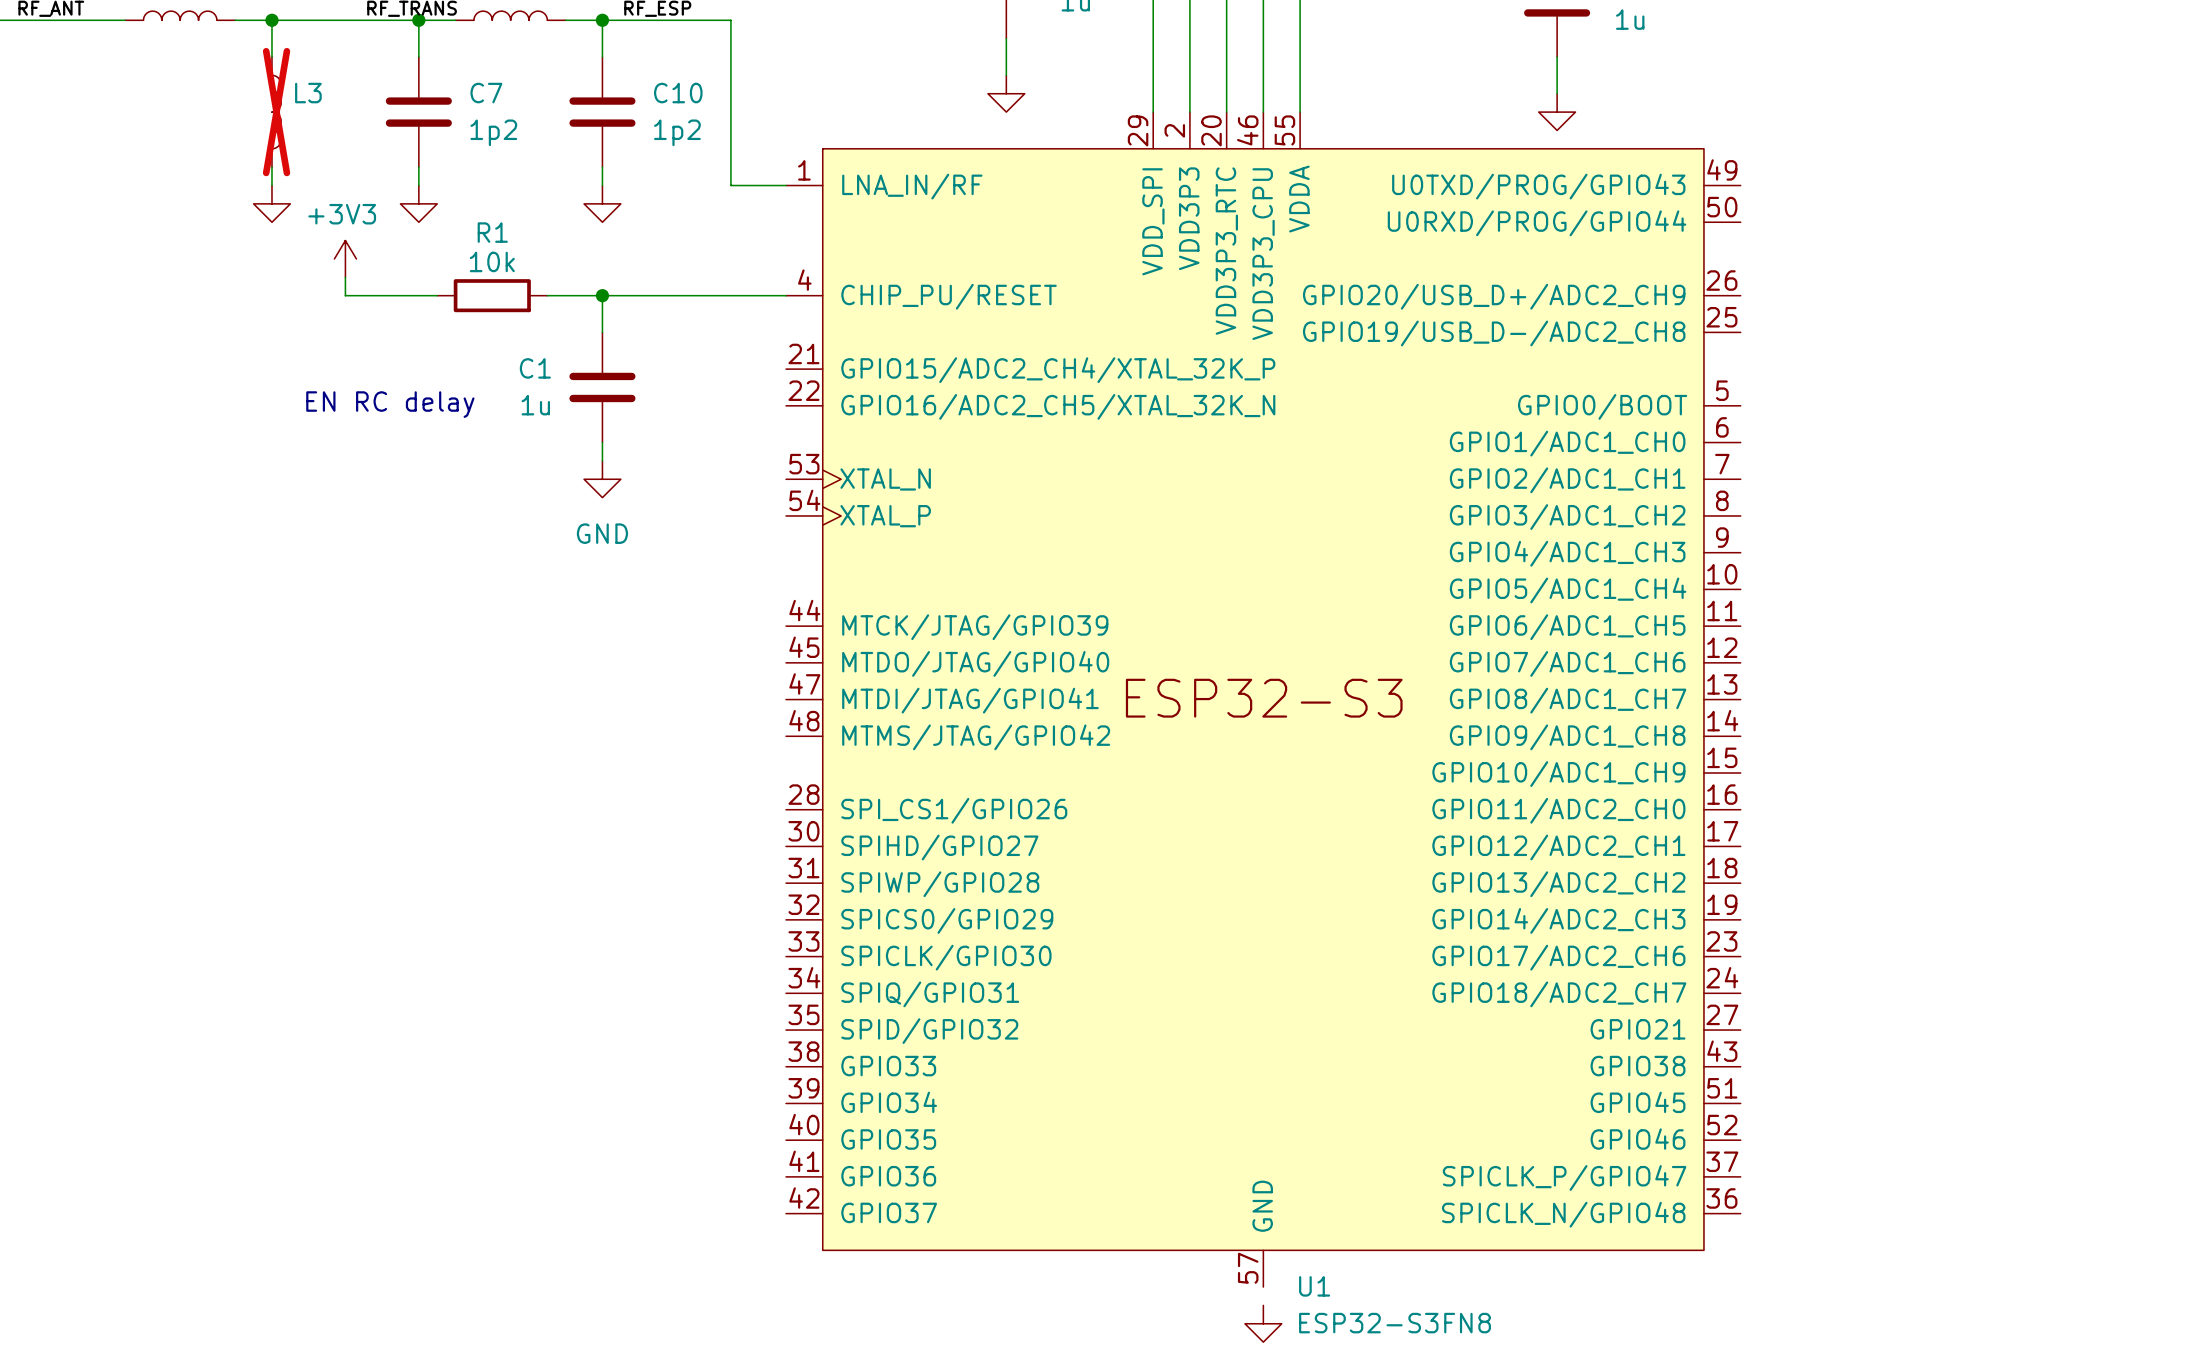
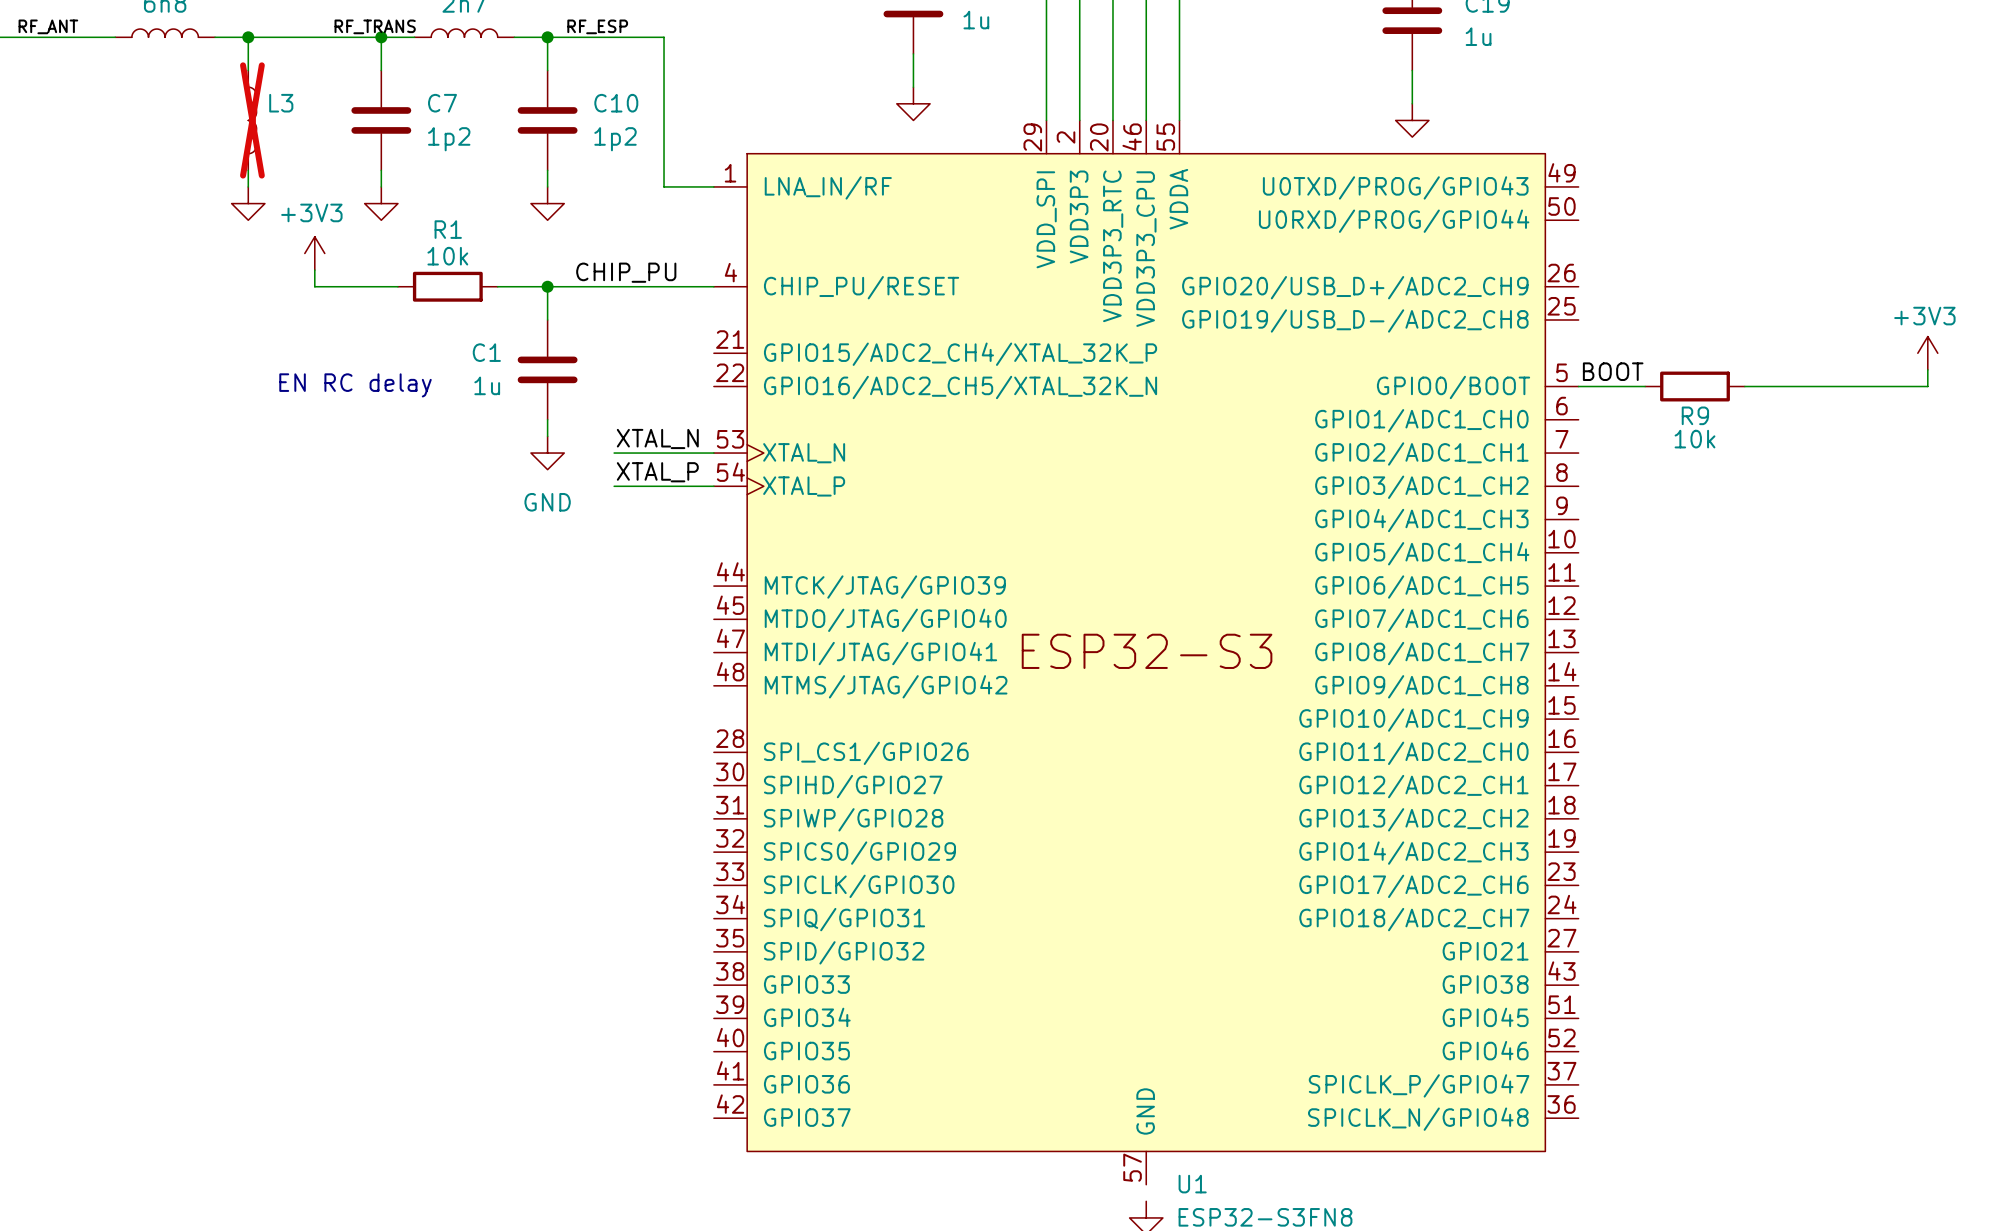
label: none -> CHIP_PU (626, 272)
power symbol: none -> +3V3 (1927, 353)
wire: none -> (1927, 369) (1927, 386) (1744, 386)
label: none -> BOOT (1613, 371)
wire: none -> (1578, 386) (1645, 386)
R9: none -> 10k (1695, 386)
label: none -> XTAL_N (657, 438)
wire: none -> (614, 453) (713, 453)
label: none -> XTAL_P (657, 472)
wire: none -> (614, 486) (713, 486)

